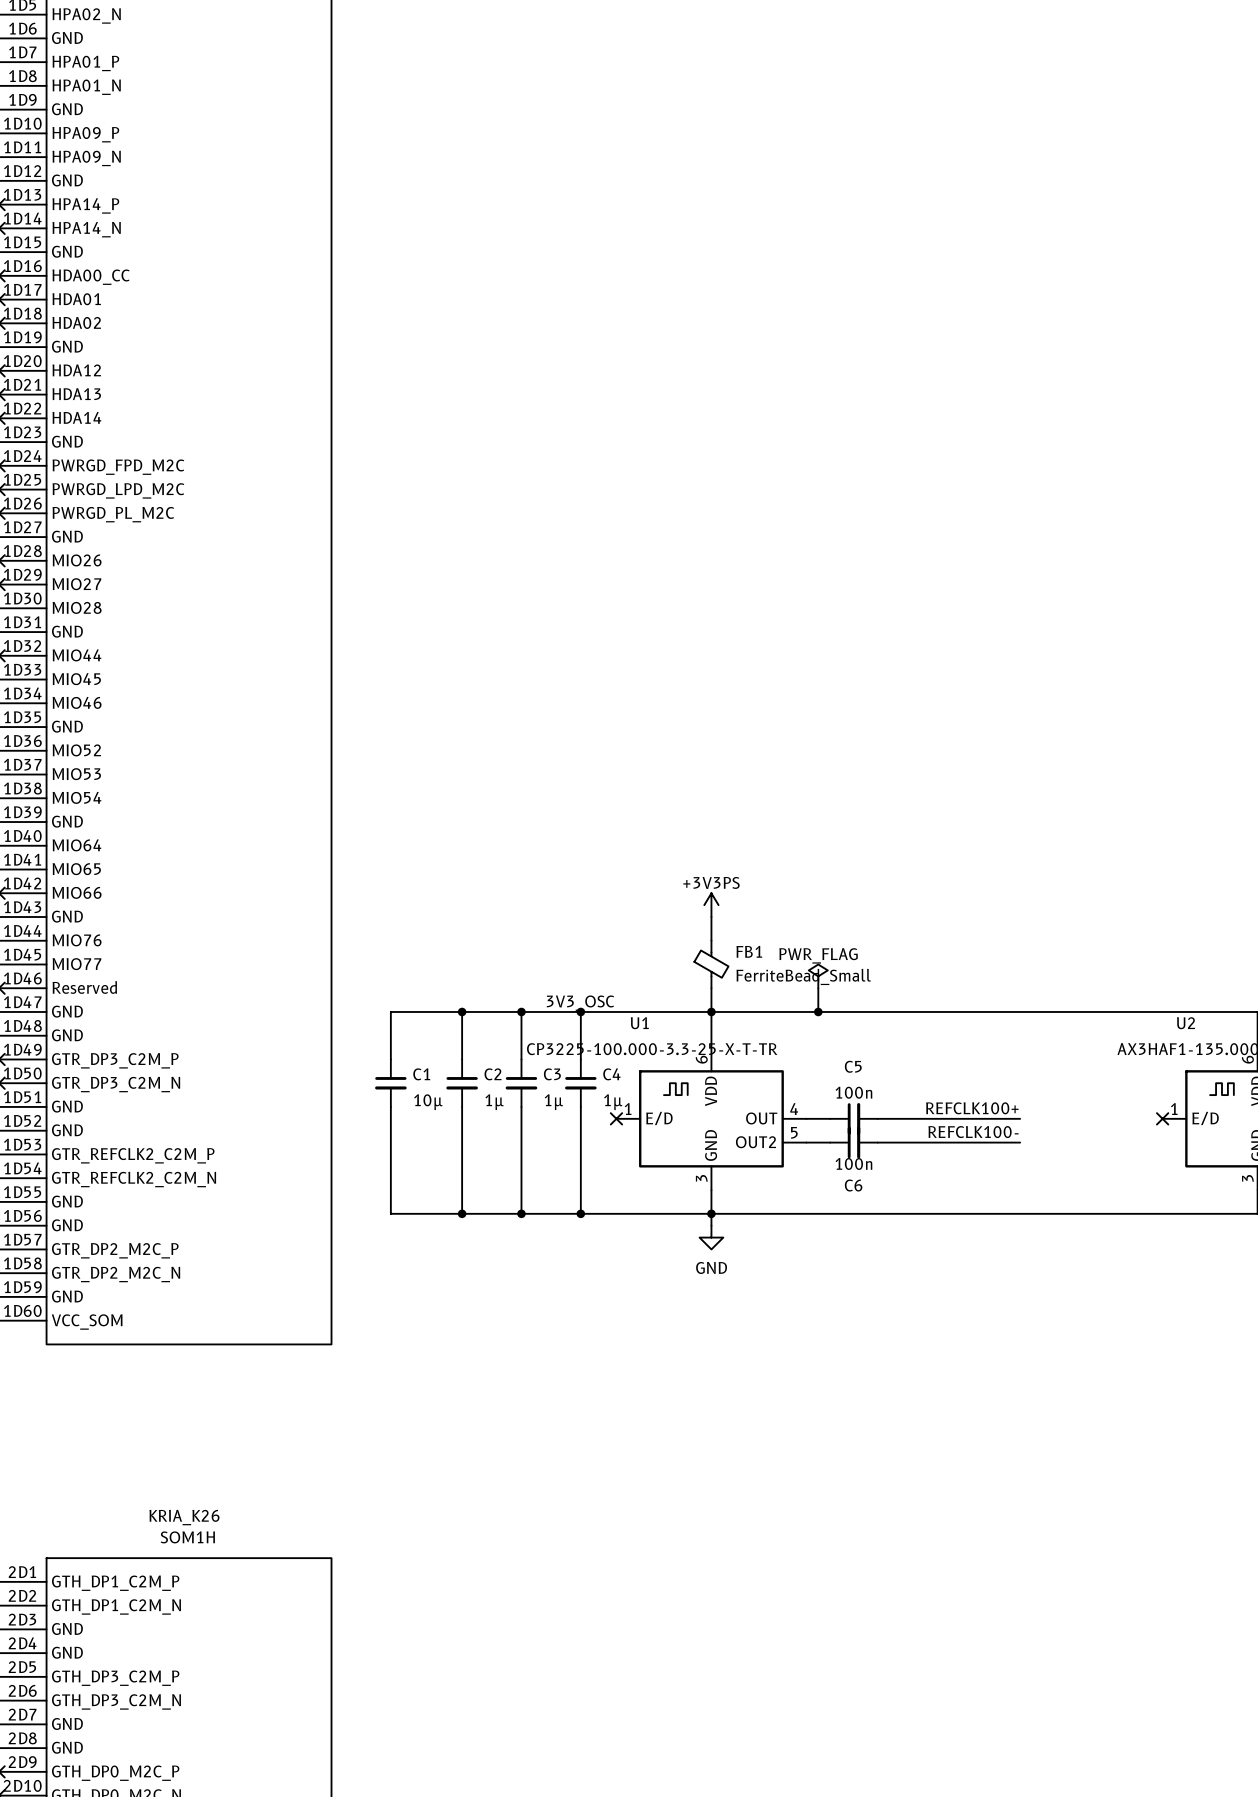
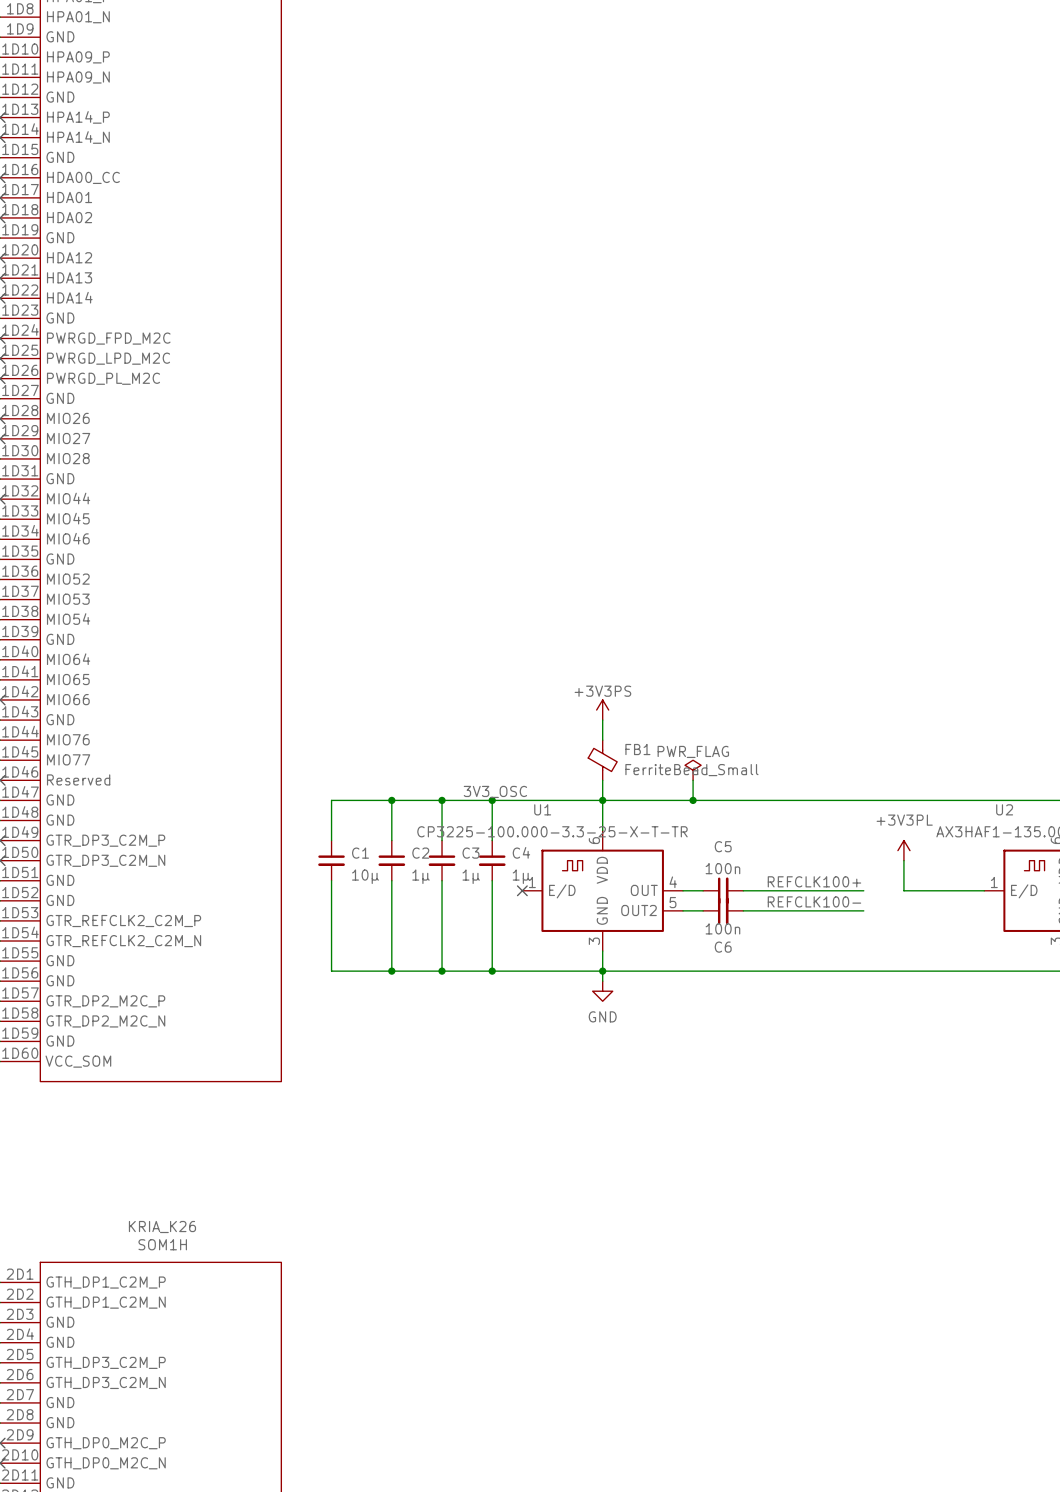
power symbol: none -> +3V3PL (903, 850)
wire: none -> (903, 860) (903, 890) (984, 890)
no-connect mark: (1162, 1118) -> none

